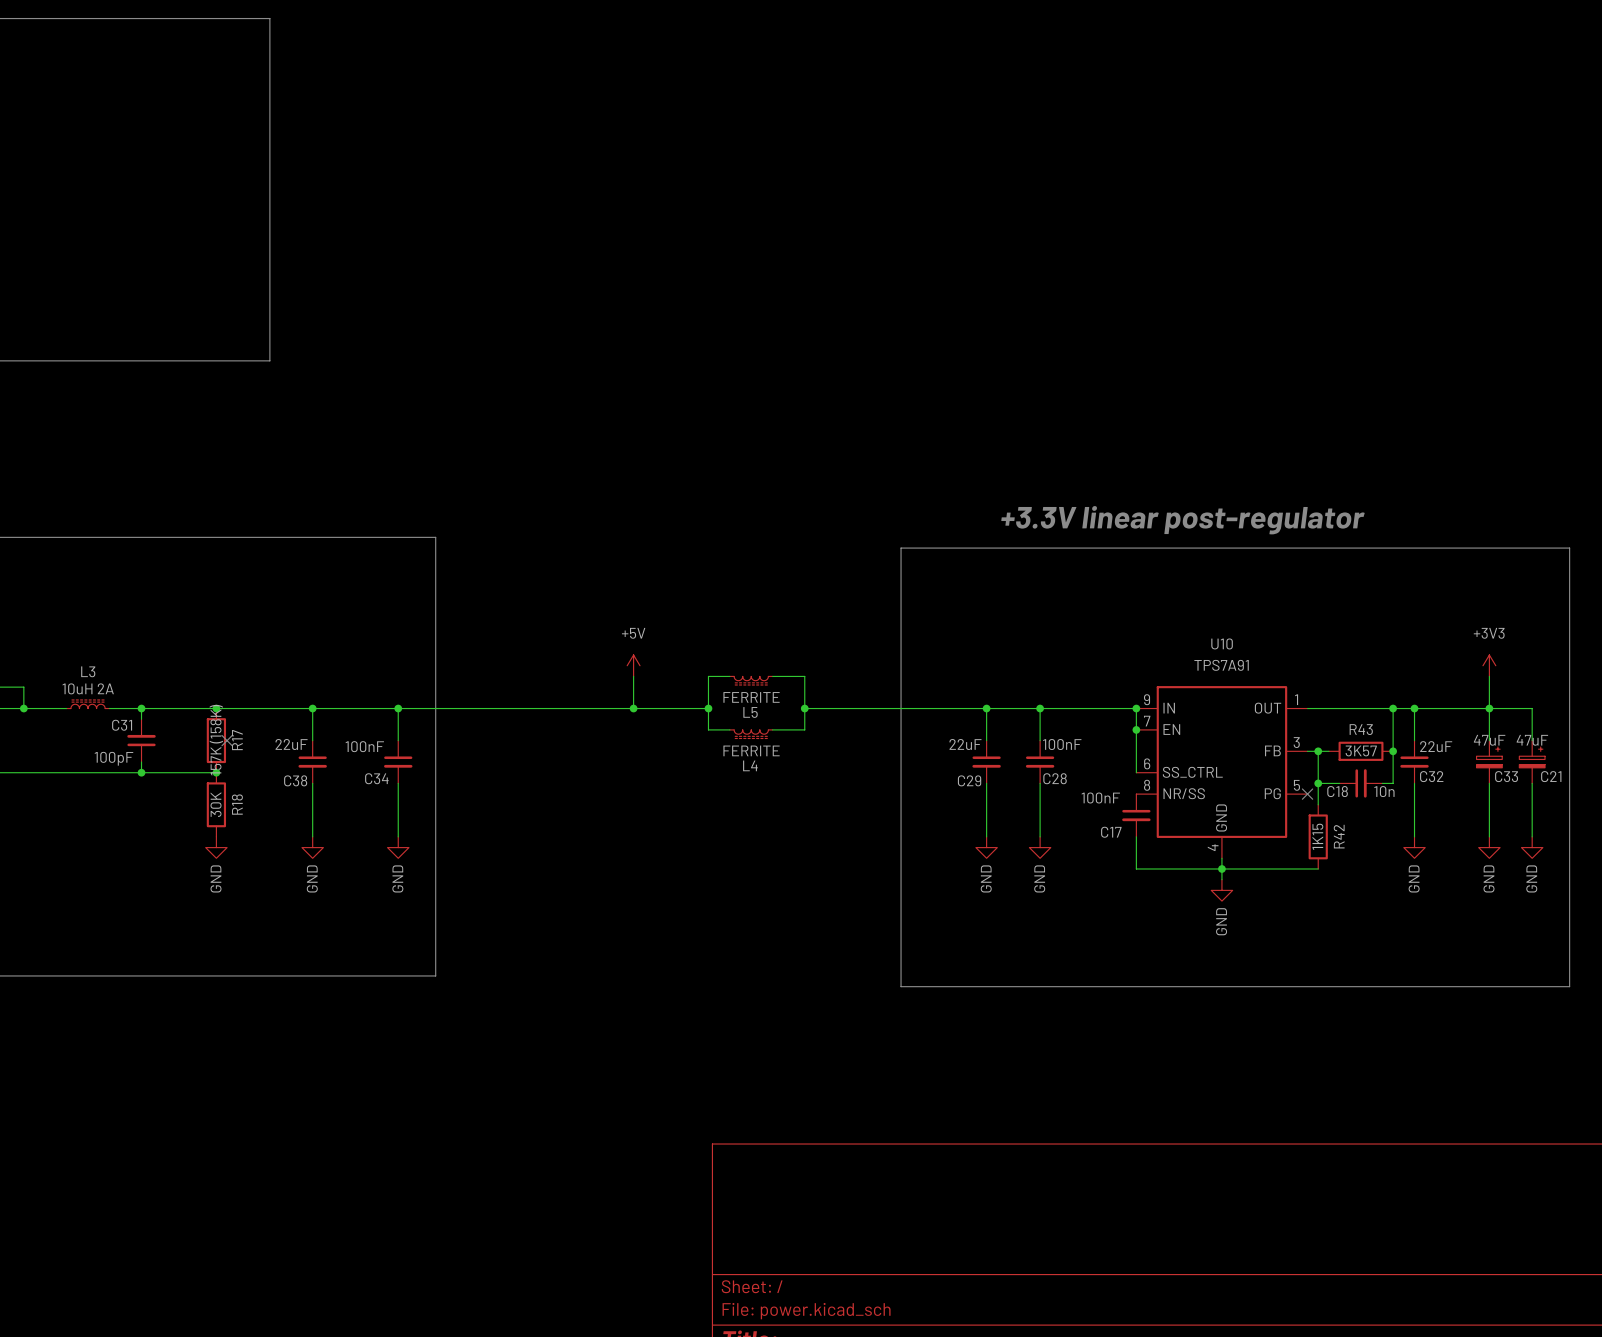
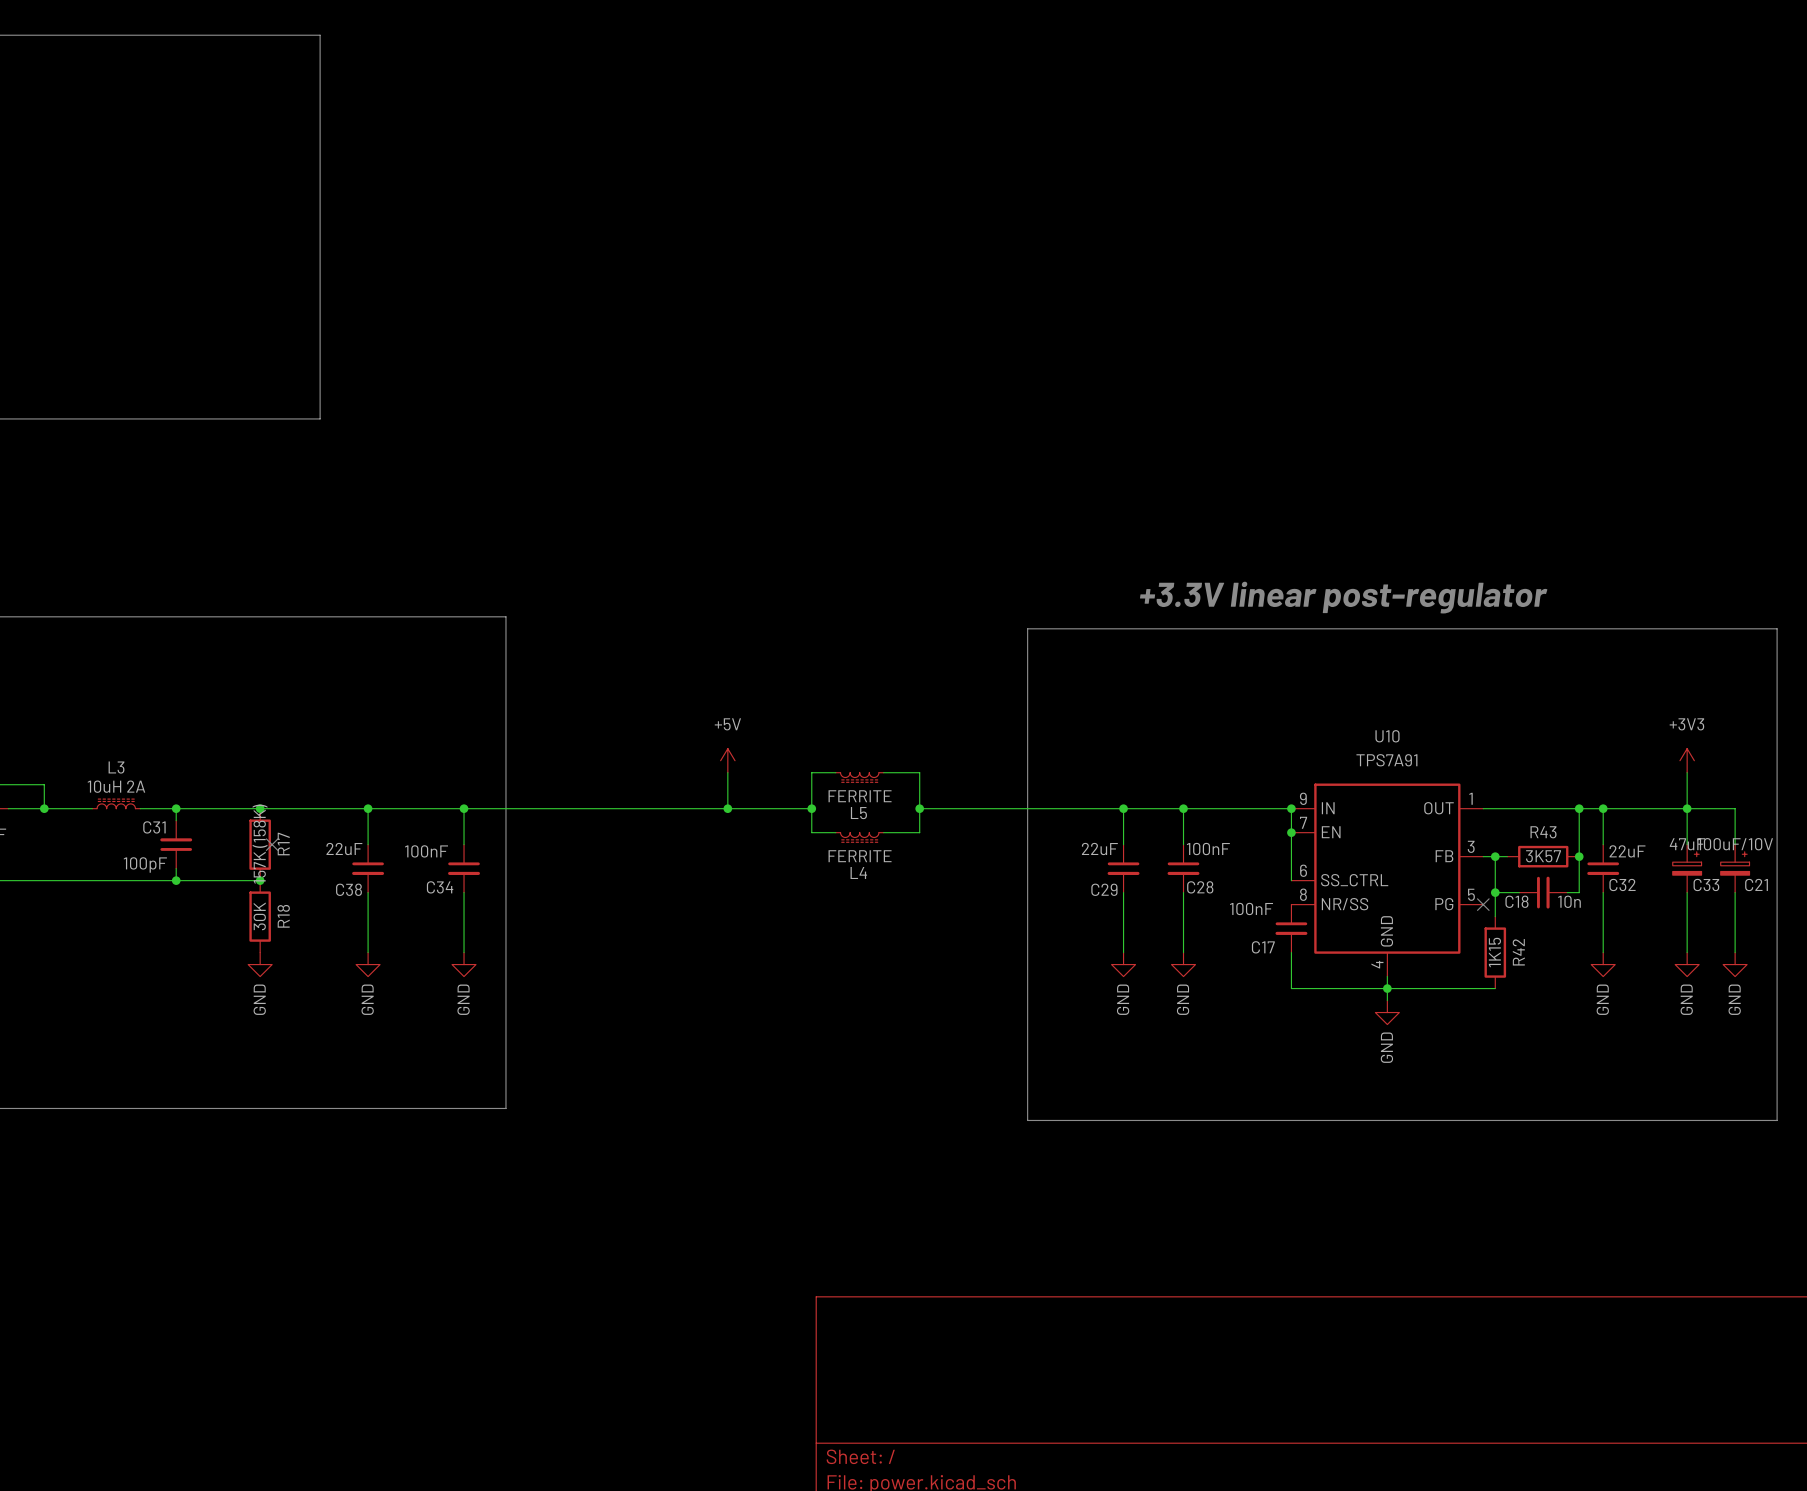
C21 value: 47uF (1532, 740) -> 100uF/10V (1735, 844)

